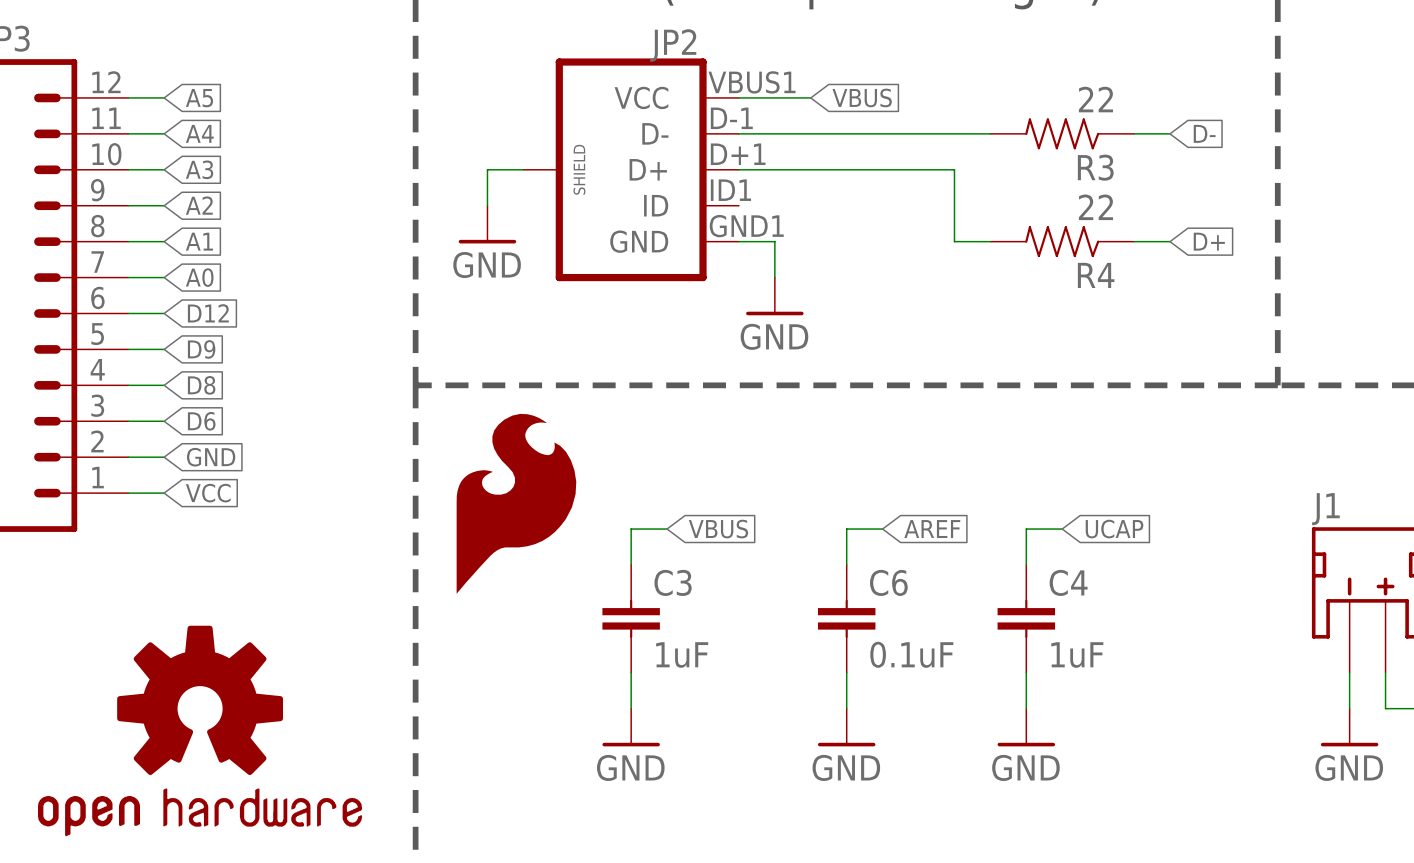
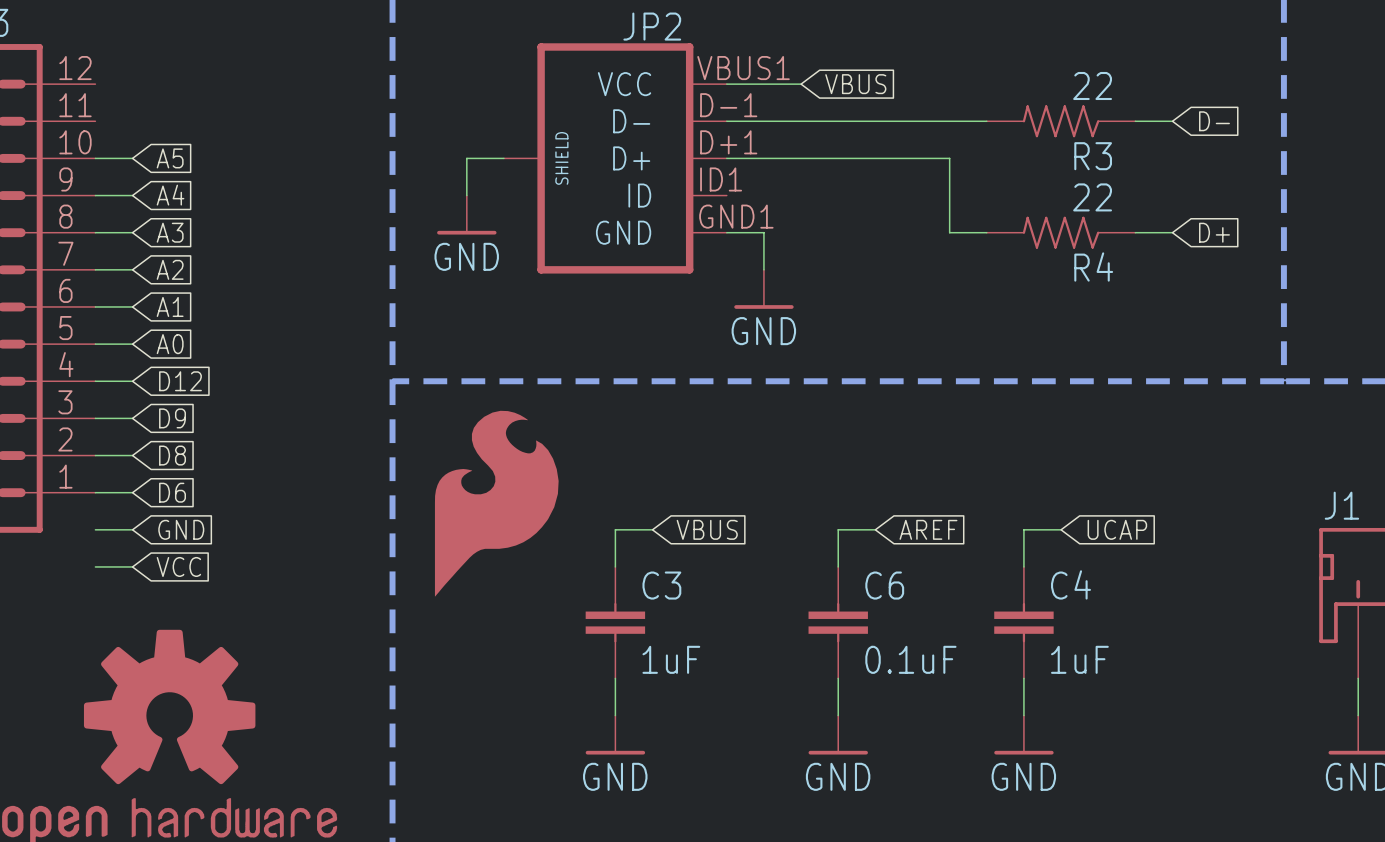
wire: (128, 97) (164, 97) -> none
global label: A5 (199, 98) -> none
wire: (128, 133) (164, 133) -> none
global label: A4 (199, 133) -> none
global label: A3 (199, 169) -> A5 (170, 158)
global label: A2 (199, 205) -> A4 (170, 195)
global label: A1 (199, 241) -> A3 (170, 232)
global label: A0 (199, 277) -> A2 (170, 269)
global label: D12 (208, 313) -> A1 (170, 306)
global label: D9 (201, 349) -> A0 (170, 344)
global label: D8 (201, 385) -> D12 (180, 381)
global label: D6 (201, 421) -> D9 (172, 418)
global label: GND (211, 457) -> D8 (172, 455)
global label: VCC (208, 493) -> D6 (172, 492)
wire: none -> (95, 529) (132, 529)
global label: none -> GND (181, 529)
wire: none -> (95, 566) (132, 566)
global label: none -> VCC (178, 566)

